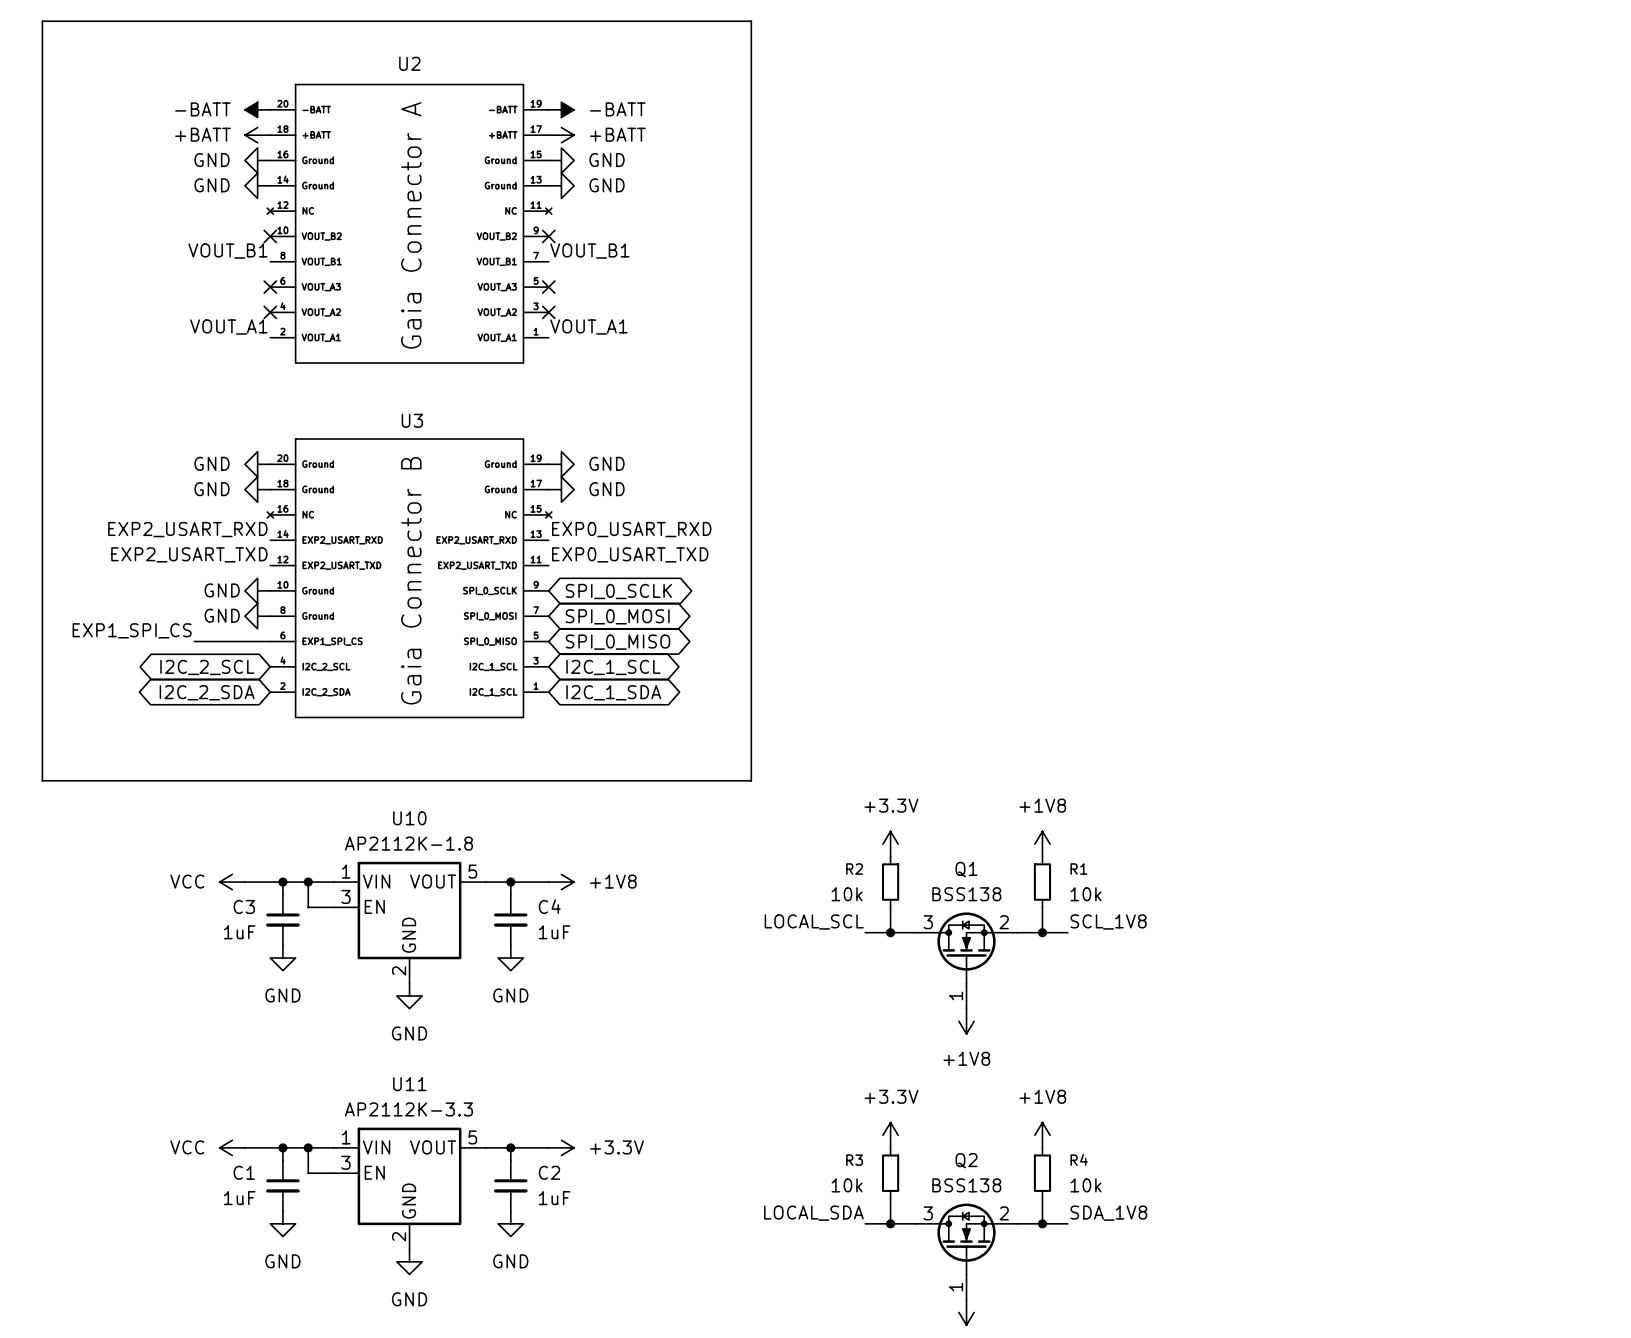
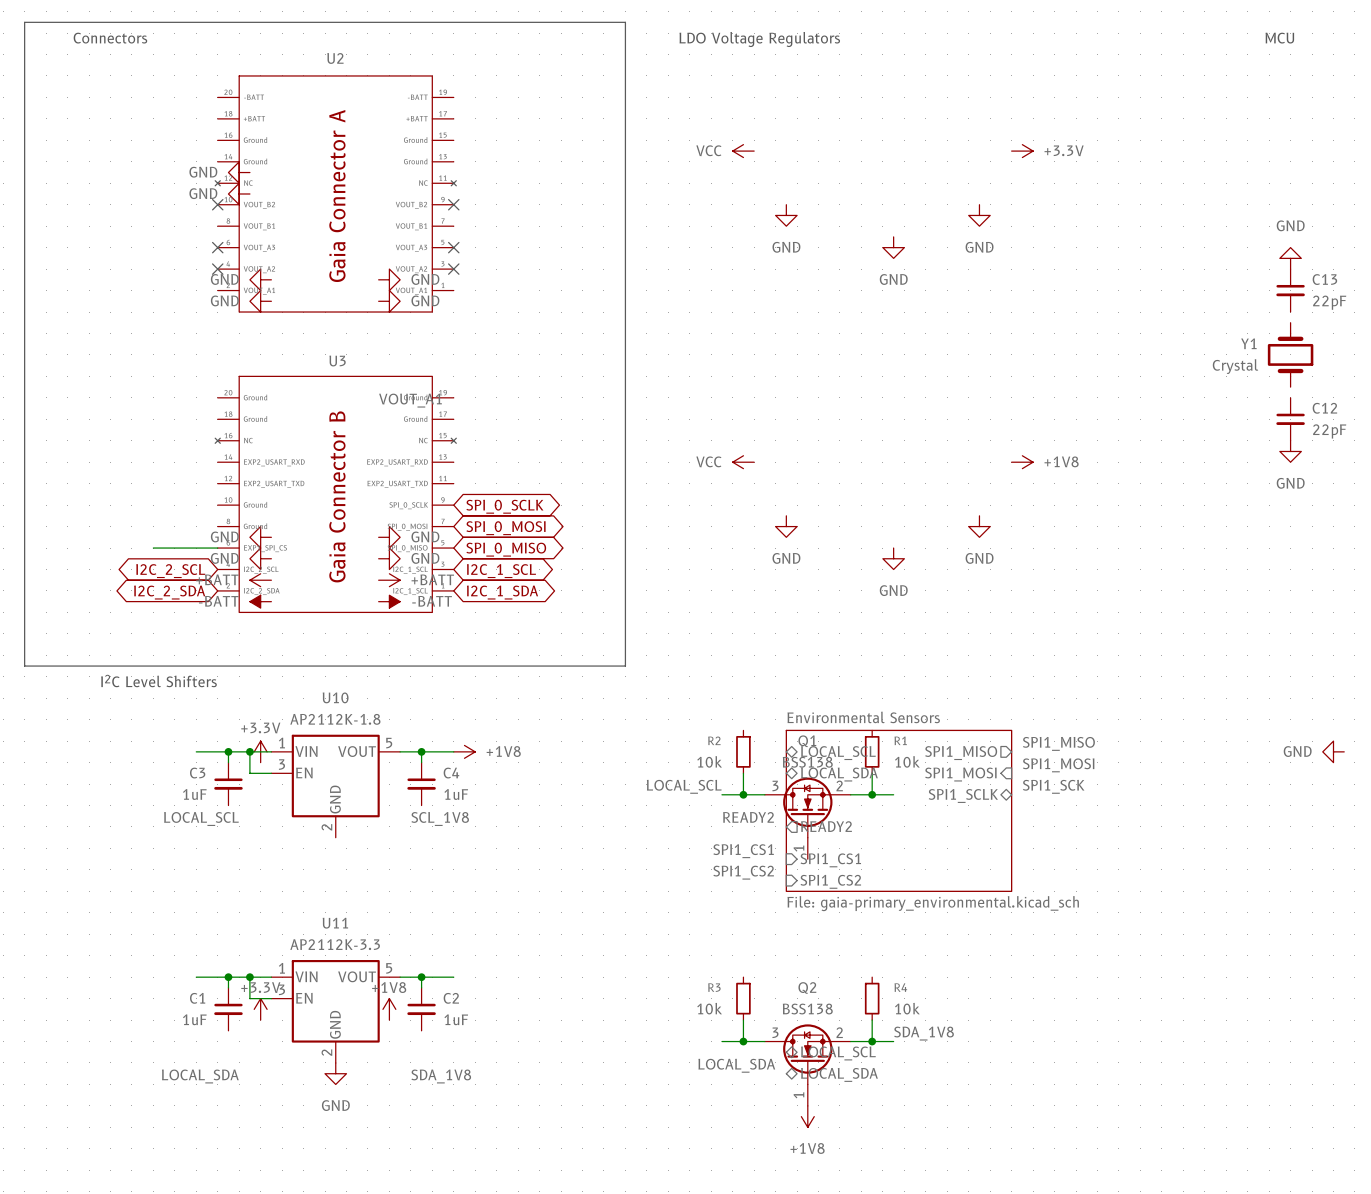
text: none -> Connectors (110, 38)
text: none -> MCU (1279, 38)
text: none -> LDO Voltage Regulators (759, 39)
power symbol: -BATT (257, 109) -> none
power symbol: -BATT (561, 109) -> none
power symbol: +BATT (257, 135) -> none
power symbol: +BATT (561, 135) -> none
power symbol: GND (257, 160) -> none
power symbol: GND (561, 160) -> none
power symbol: none -> VCC (743, 151)
power symbol: none -> +3.3V (1022, 151)
power symbol: GND (257, 185) -> none
power symbol: GND (561, 185) -> none
power symbol: none -> GND (239, 172)
power symbol: none -> GND (239, 193)
power symbol: none -> GND (786, 215)
power symbol: none -> GND (979, 215)
label: VOUT_B1 (227, 251) -> none
label: VOUT_B1 (589, 251) -> none
power symbol: none -> GND (893, 247)
power symbol: none -> GND (1290, 258)
power symbol: none -> GND (260, 279)
power symbol: none -> GND (389, 279)
label: VOUT_A1 (228, 327) -> none
label: VOUT_A1 (588, 327) -> none
C13: none -> 22pF (1290, 290)
power symbol: none -> GND (260, 301)
power symbol: none -> GND (389, 301)
Y1: none -> Crystal (1290, 354)
power symbol: GND (257, 464) -> none
power symbol: GND (561, 464) -> none
label: none -> VOUT_A1 (410, 400)
power symbol: GND (257, 489) -> none
power symbol: GND (561, 489) -> none
C12: none -> 22pF (1290, 419)
power symbol: none -> GND (1290, 451)
label: EXP2_USART_RXD (187, 529) -> none
label: EXP0_USART_RXD (631, 529) -> none
power symbol: none -> VCC (743, 462)
power symbol: none -> +1V8 (1022, 462)
label: EXP2_USART_TXD (189, 554) -> none
label: EXP0_USART_TXD (630, 554) -> none
power symbol: GND (257, 590) -> none
power symbol: GND (257, 616) -> none
power symbol: none -> GND (786, 526)
power symbol: none -> GND (979, 526)
power symbol: none -> GND (260, 537)
power symbol: none -> GND (389, 537)
label: EXP1_SPI_CS (132, 630) -> none
power symbol: none -> GND (260, 558)
power symbol: none -> GND (389, 558)
power symbol: none -> GND (893, 558)
power symbol: none -> +BATT (260, 580)
power symbol: none -> +BATT (389, 580)
power symbol: none -> -BATT (260, 601)
power symbol: none -> -BATT (389, 601)
text: none -> I2C Level Shifters (158, 681)
power symbol: +3.3V (890, 844) -> none
power symbol: +1V8 (1042, 844) -> none
label: none -> SPI1_MISO (1058, 743)
power symbol: VCC (232, 882) -> none
power symbol: none -> +3.3V (260, 751)
sheet pin: none -> LOCAL_SCL (838, 753)
sheet pin: none -> SPI1_MISO (961, 753)
power symbol: none -> GND (1333, 751)
label: none -> SPI1_MOSI (1058, 765)
sheet pin: none -> LOCAL_SDA (839, 774)
sheet pin: none -> SPI1_MOSI (960, 774)
label: SCL_1V8 (1108, 921) -> none
label: none -> SPI1_SCK (1053, 786)
sheet pin: none -> SPI1_SCLK (963, 795)
sheet Environmental Sensors: none -> File: gaia-primary_environmental.kicad_sch (898, 810)
power symbol: GND (282, 958) -> none
power symbol: GND (510, 958) -> none
label: none -> LOCAL_SCL (201, 819)
label: none -> SCL_1V8 (440, 819)
label: none -> READY2 (748, 817)
sheet pin: none -> READY2 (826, 826)
power symbol: GND (409, 995) -> none
label: none -> SPI1_CS1 (743, 851)
sheet pin: none -> SPI1_CS1 (830, 860)
power symbol: +1V8 (966, 1021) -> none
label: none -> SPI1_CS2 (743, 872)
sheet pin: none -> SPI1_CS2 (830, 881)
power symbol: +3.3V (890, 1135) -> none
power symbol: +1V8 (1042, 1135) -> none
power symbol: VCC (232, 1147) -> none
power symbol: +3.3V (561, 1147) -> none
power symbol: none -> +3.3V (260, 1009)
power symbol: none -> +1V8 (389, 1009)
label position: LOCAL_SDA (813, 1213) -> LOCAL_SDA (736, 1065)
power symbol: GND (282, 1223) -> none
power symbol: GND (510, 1223) -> none
sheet pin: none -> LOCAL_SCL (838, 1053)
sheet pin: none -> LOCAL_SDA (839, 1074)
label: none -> LOCAL_SDA (200, 1076)
label: none -> SDA_1V8 (441, 1076)

